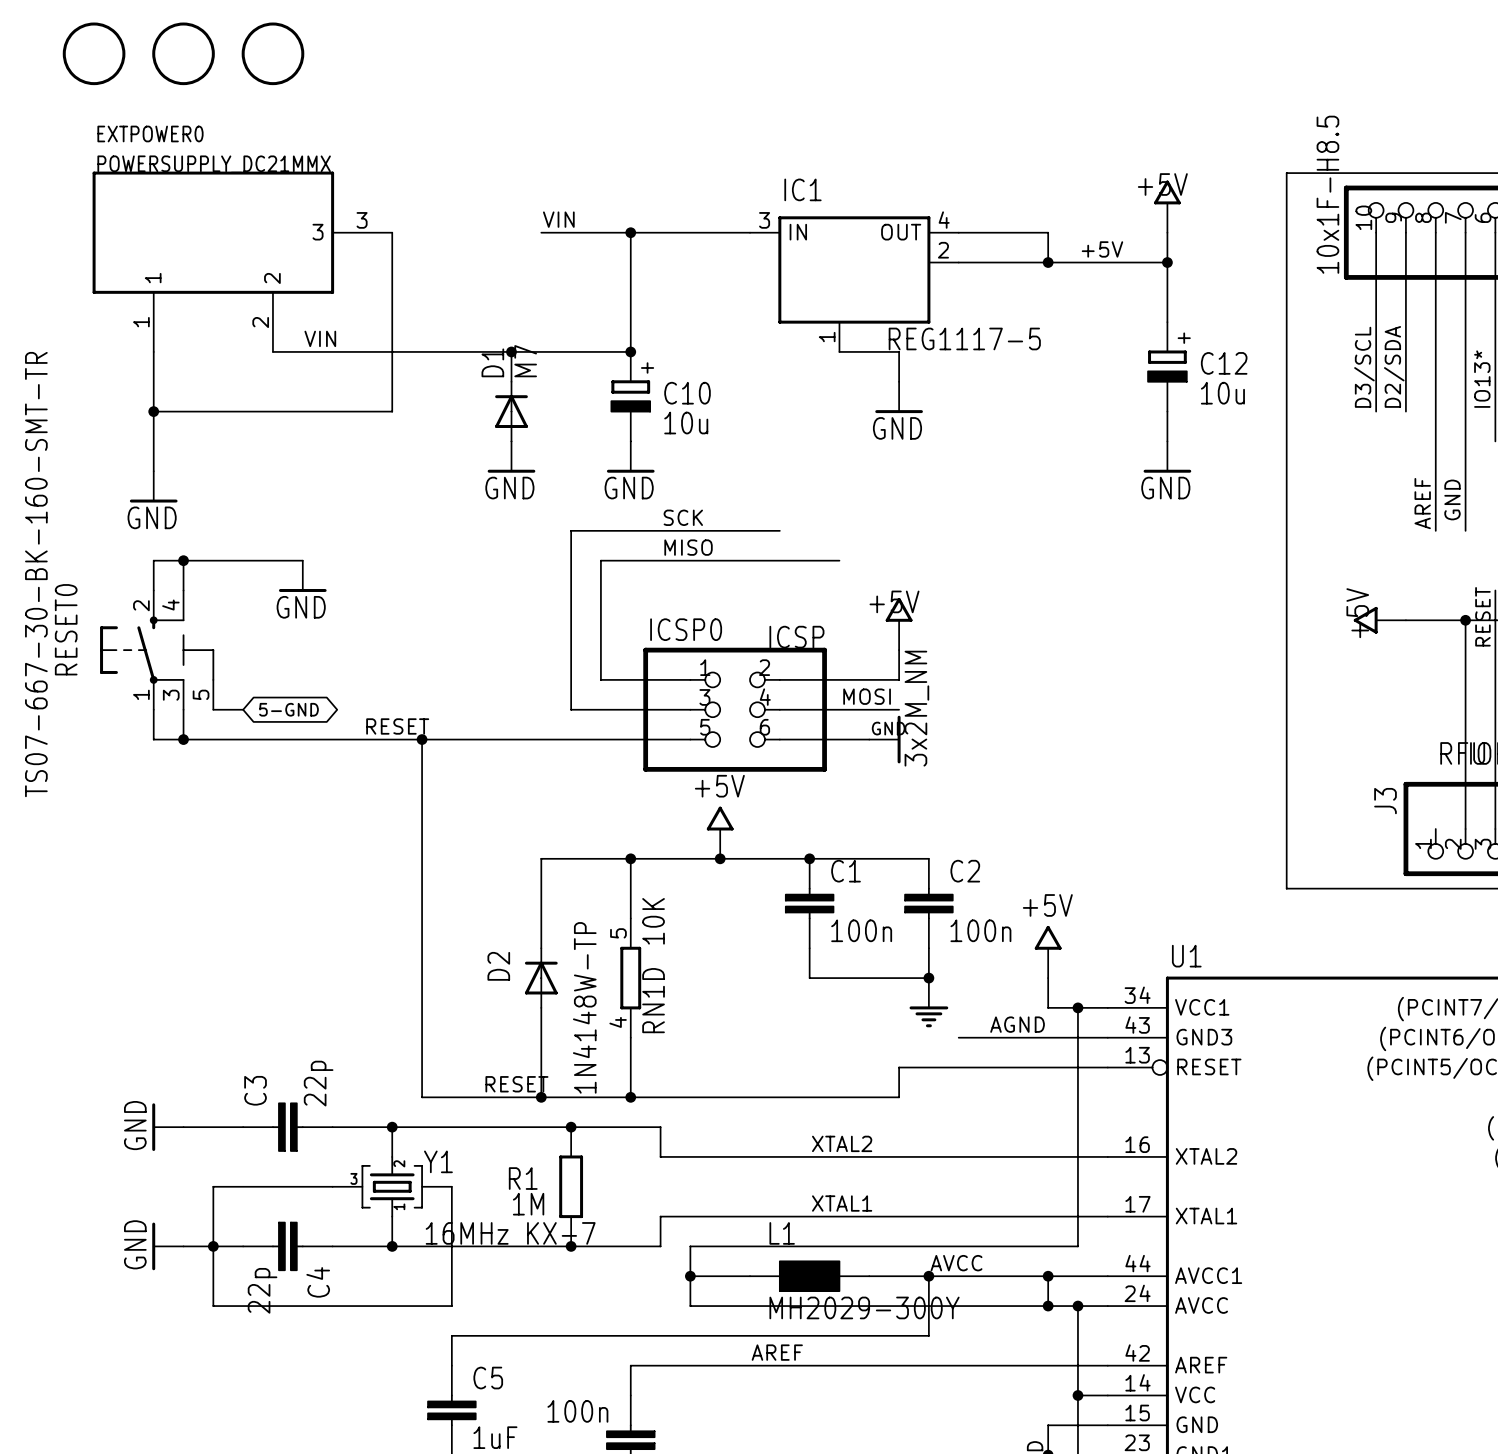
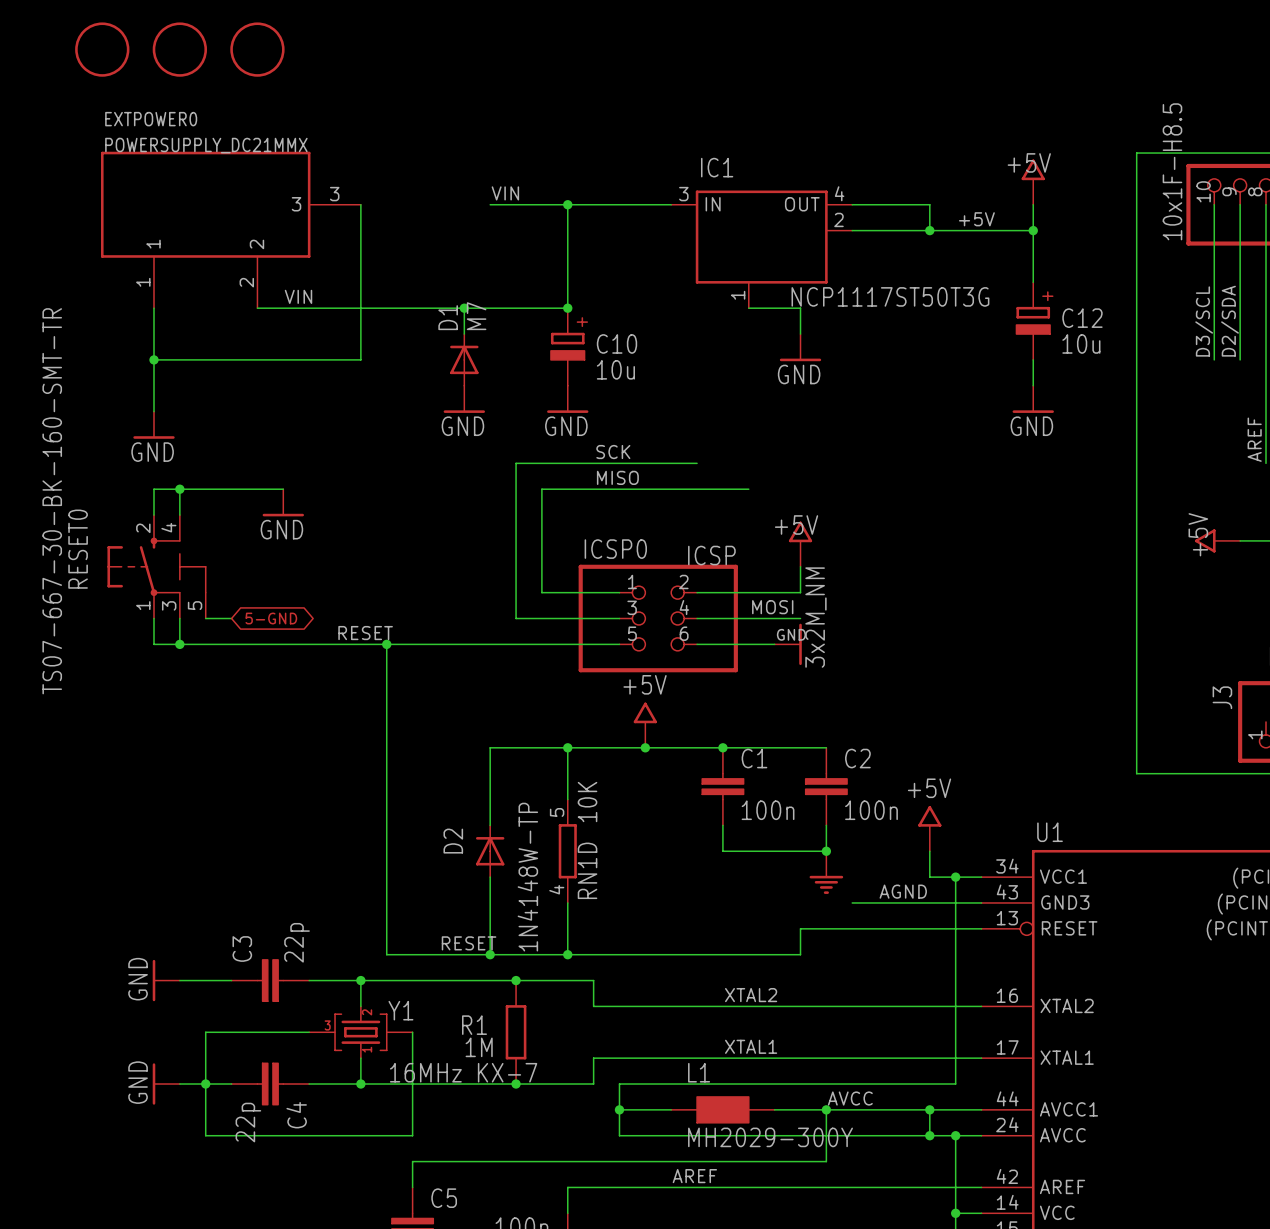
IC1 value: REG1117-5 (964, 338) -> NCP1117ST50T3G (890, 296)

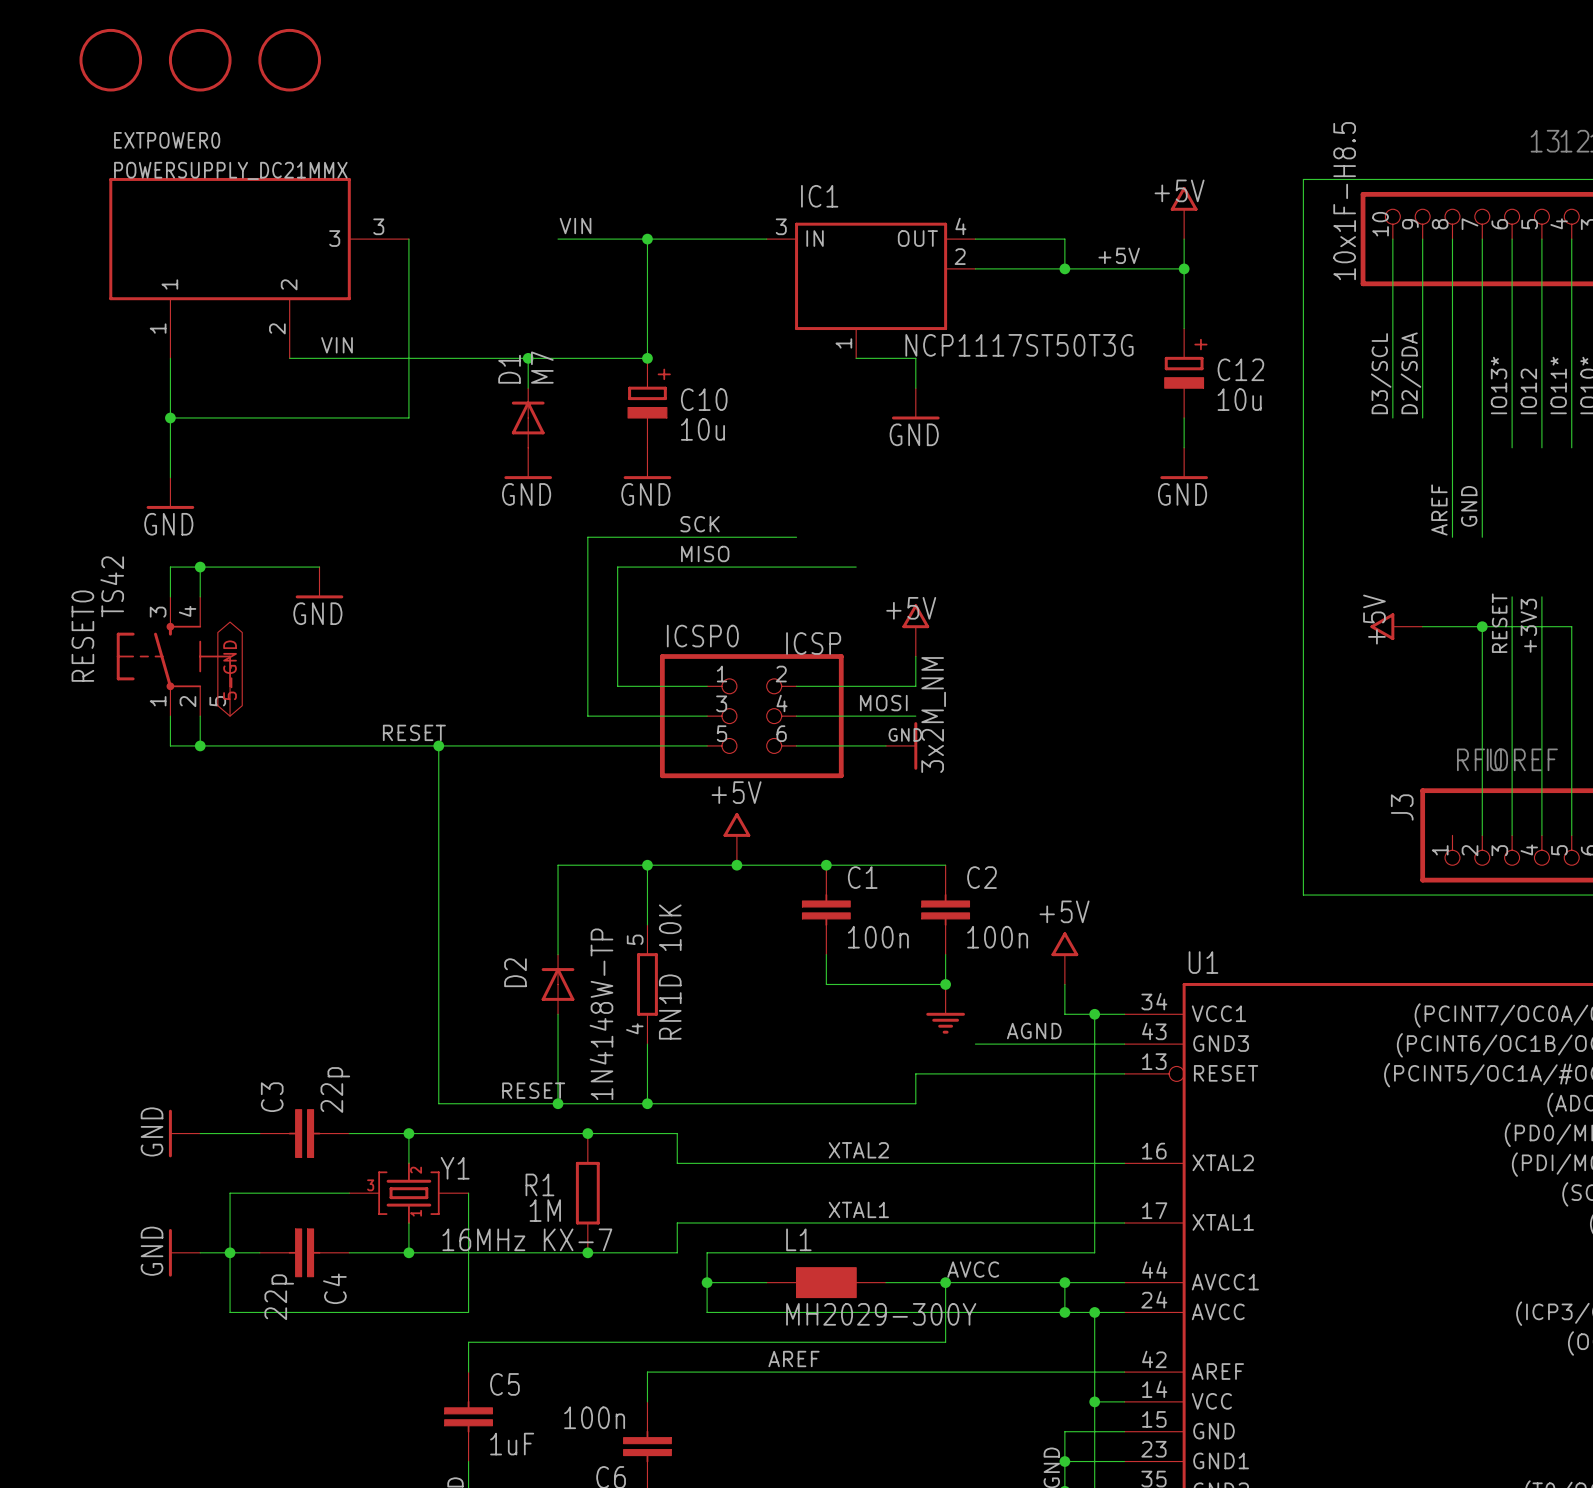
RESET0 value: TS07-667-30-BK-160-SMT-TR (52, 501) -> TS42 (112, 586)
RESET0 pin number: 2 (143, 528) -> 3 (158, 612)
RESET0 pin number: 3 (169, 605) -> 2 (187, 701)
wire: (205, 618) (231, 618) -> none
global label rotation: 0° (271, 618) -> 90° counterclockwise (230, 670)

